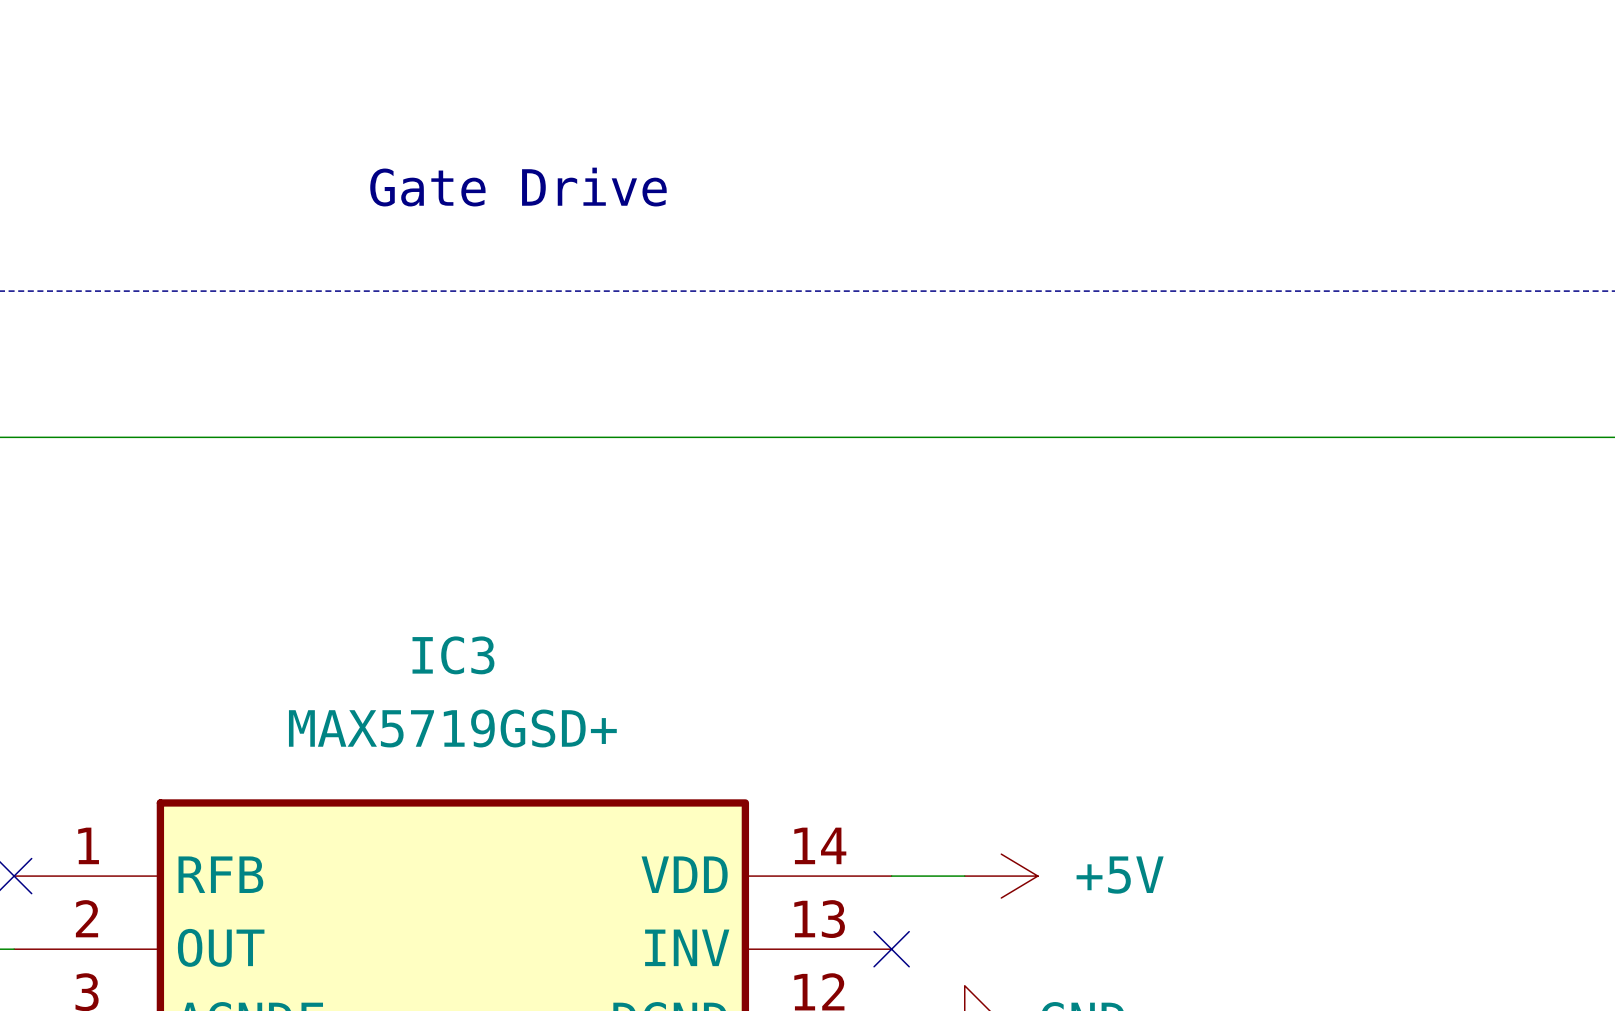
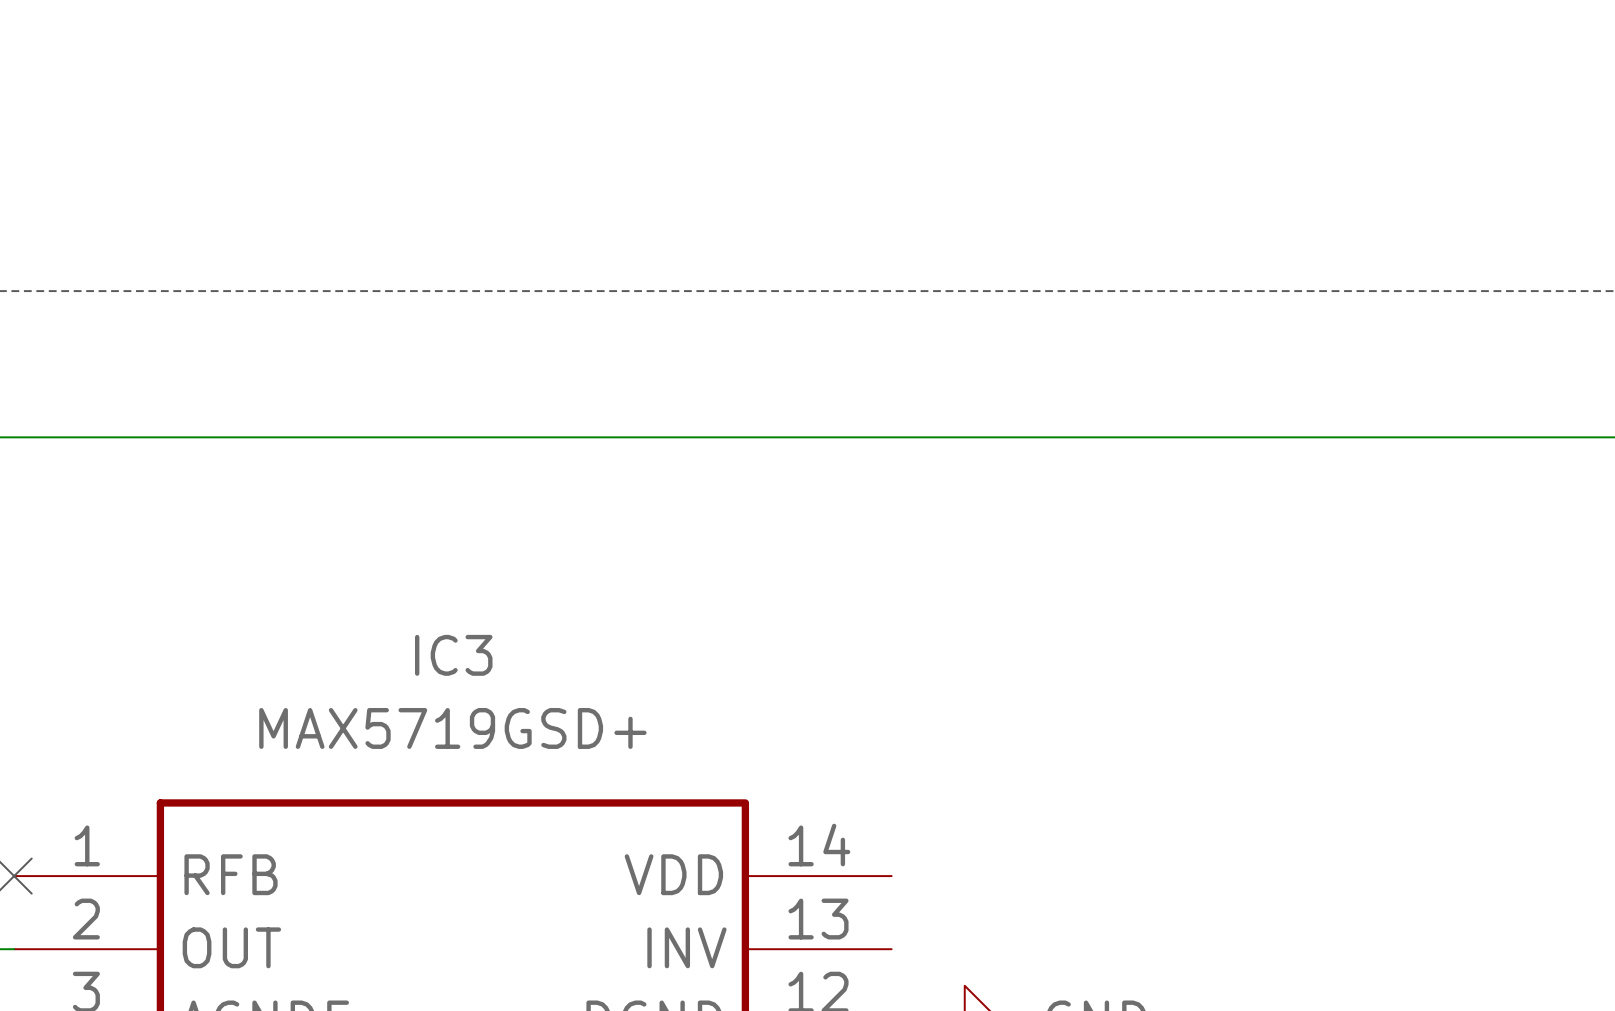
text: Gate Drive (518, 187) -> none
wire: (891, 876) (964, 876) -> none
power symbol: +5V (1001, 876) -> none
no-connect mark: (891, 949) -> none

